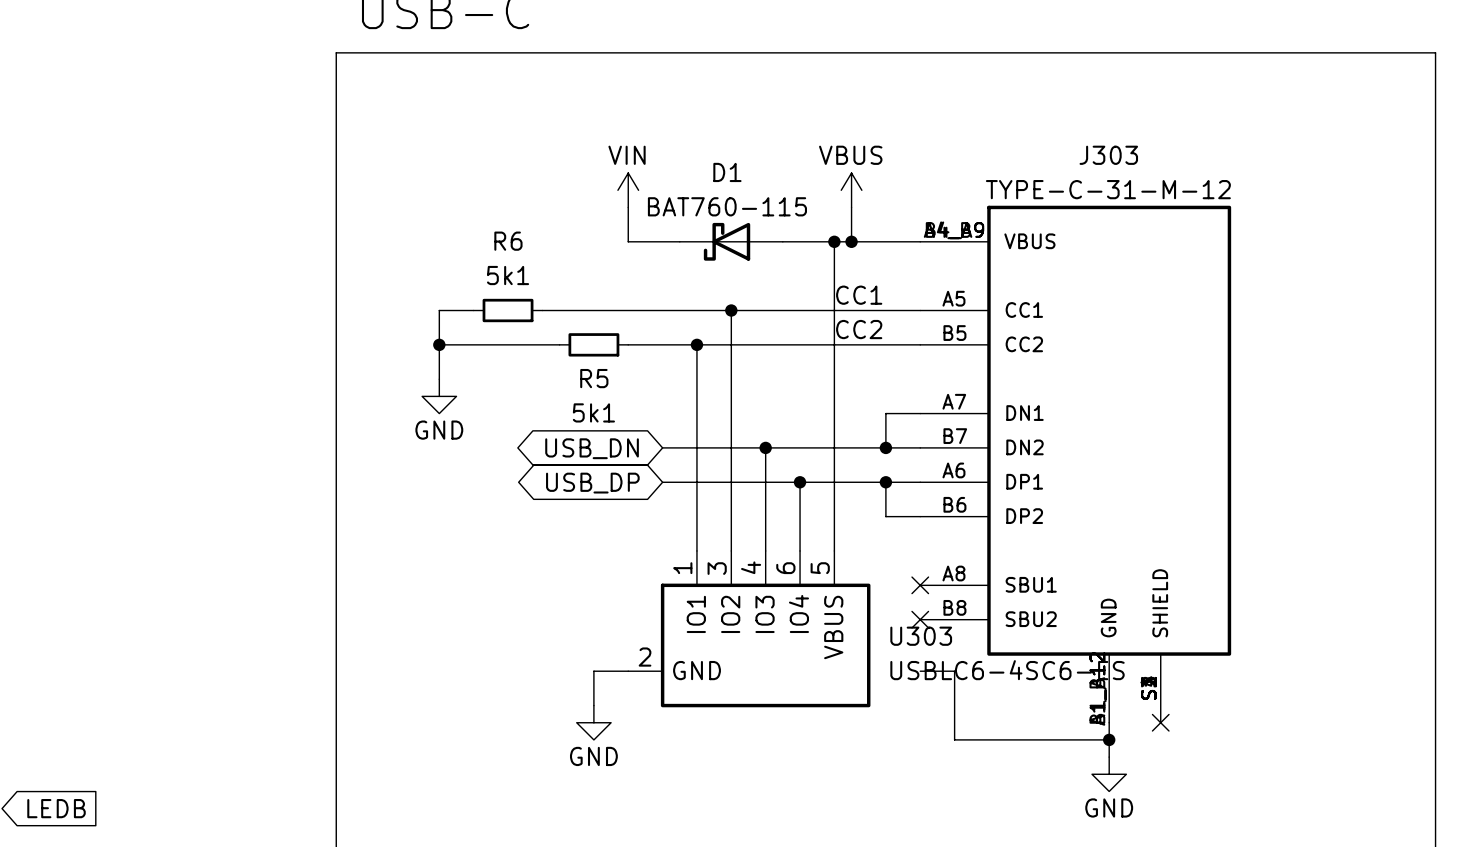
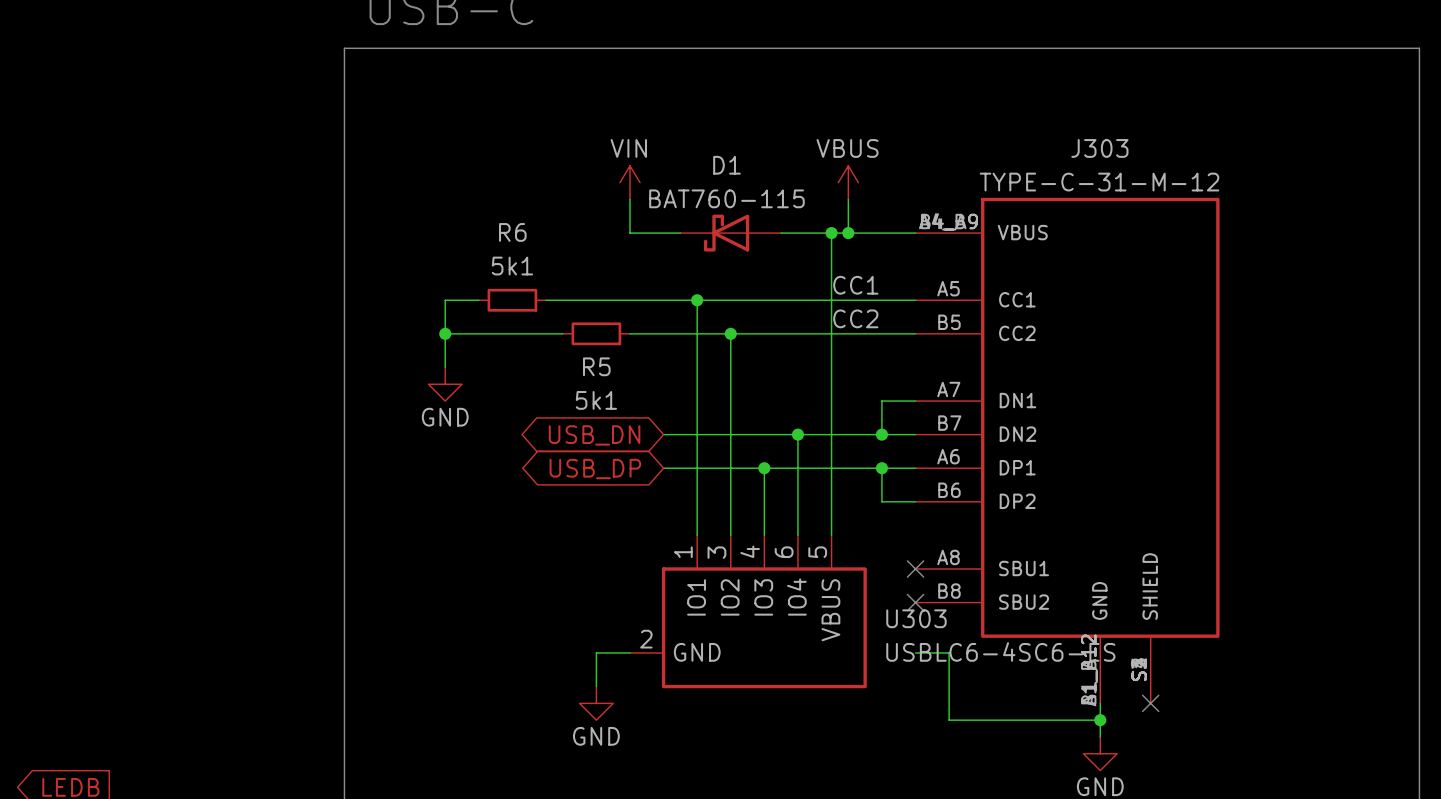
junction: none -> (697, 300)
wire: (731, 310) (731, 344) -> (697, 300) (697, 333)
junction: (731, 310) -> none
junction: (696, 344) -> none
junction: none -> (730, 333)
wire: (765, 447) (765, 482) -> (797, 434) (797, 468)
junction: (765, 447) -> none
junction: none -> (797, 434)
junction: none -> (764, 468)
junction: (800, 482) -> none

